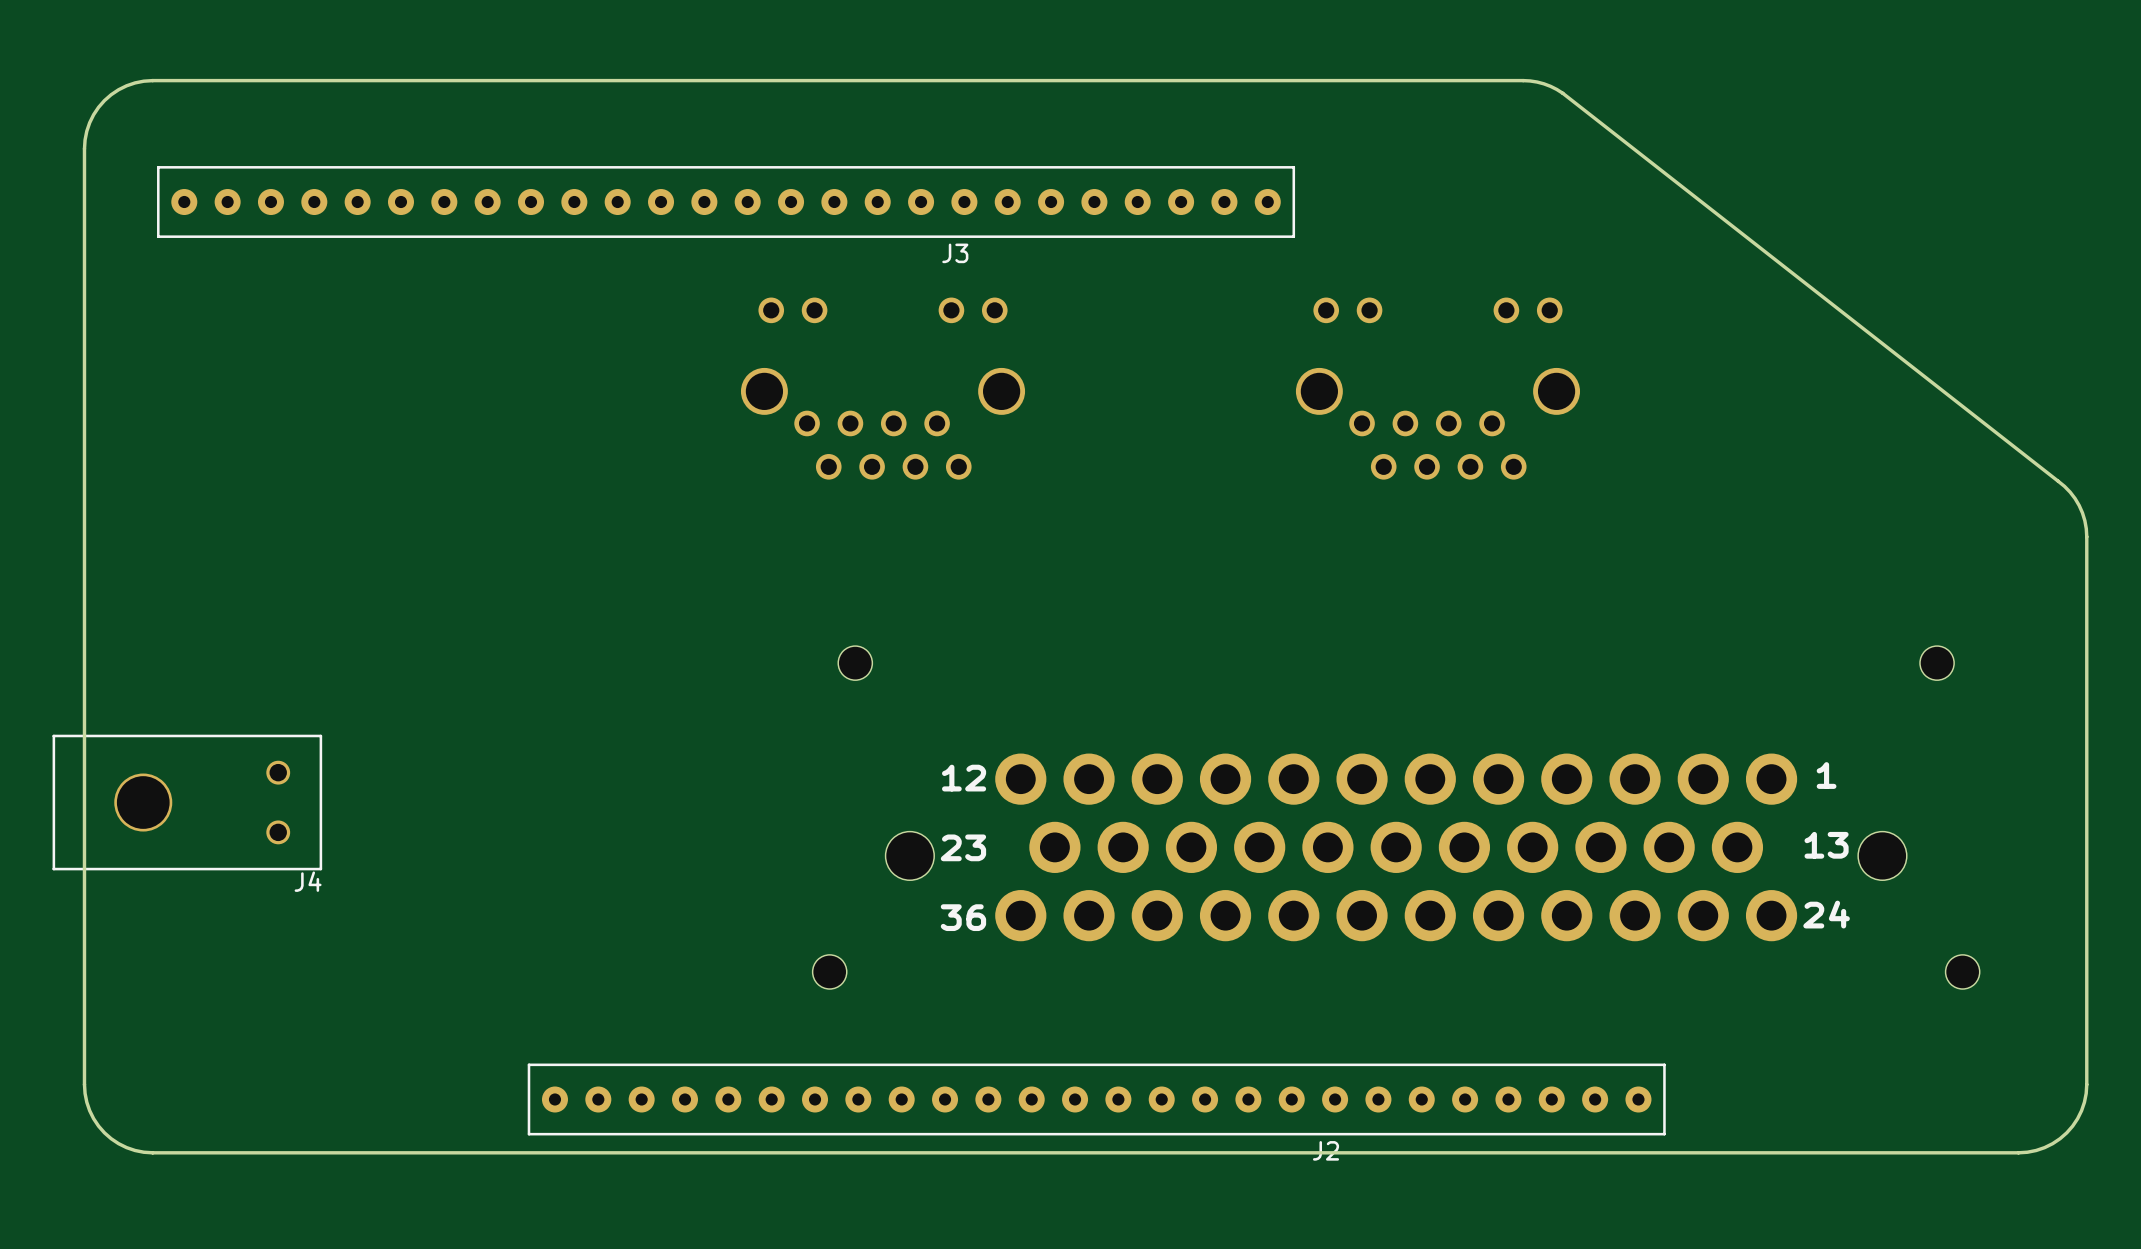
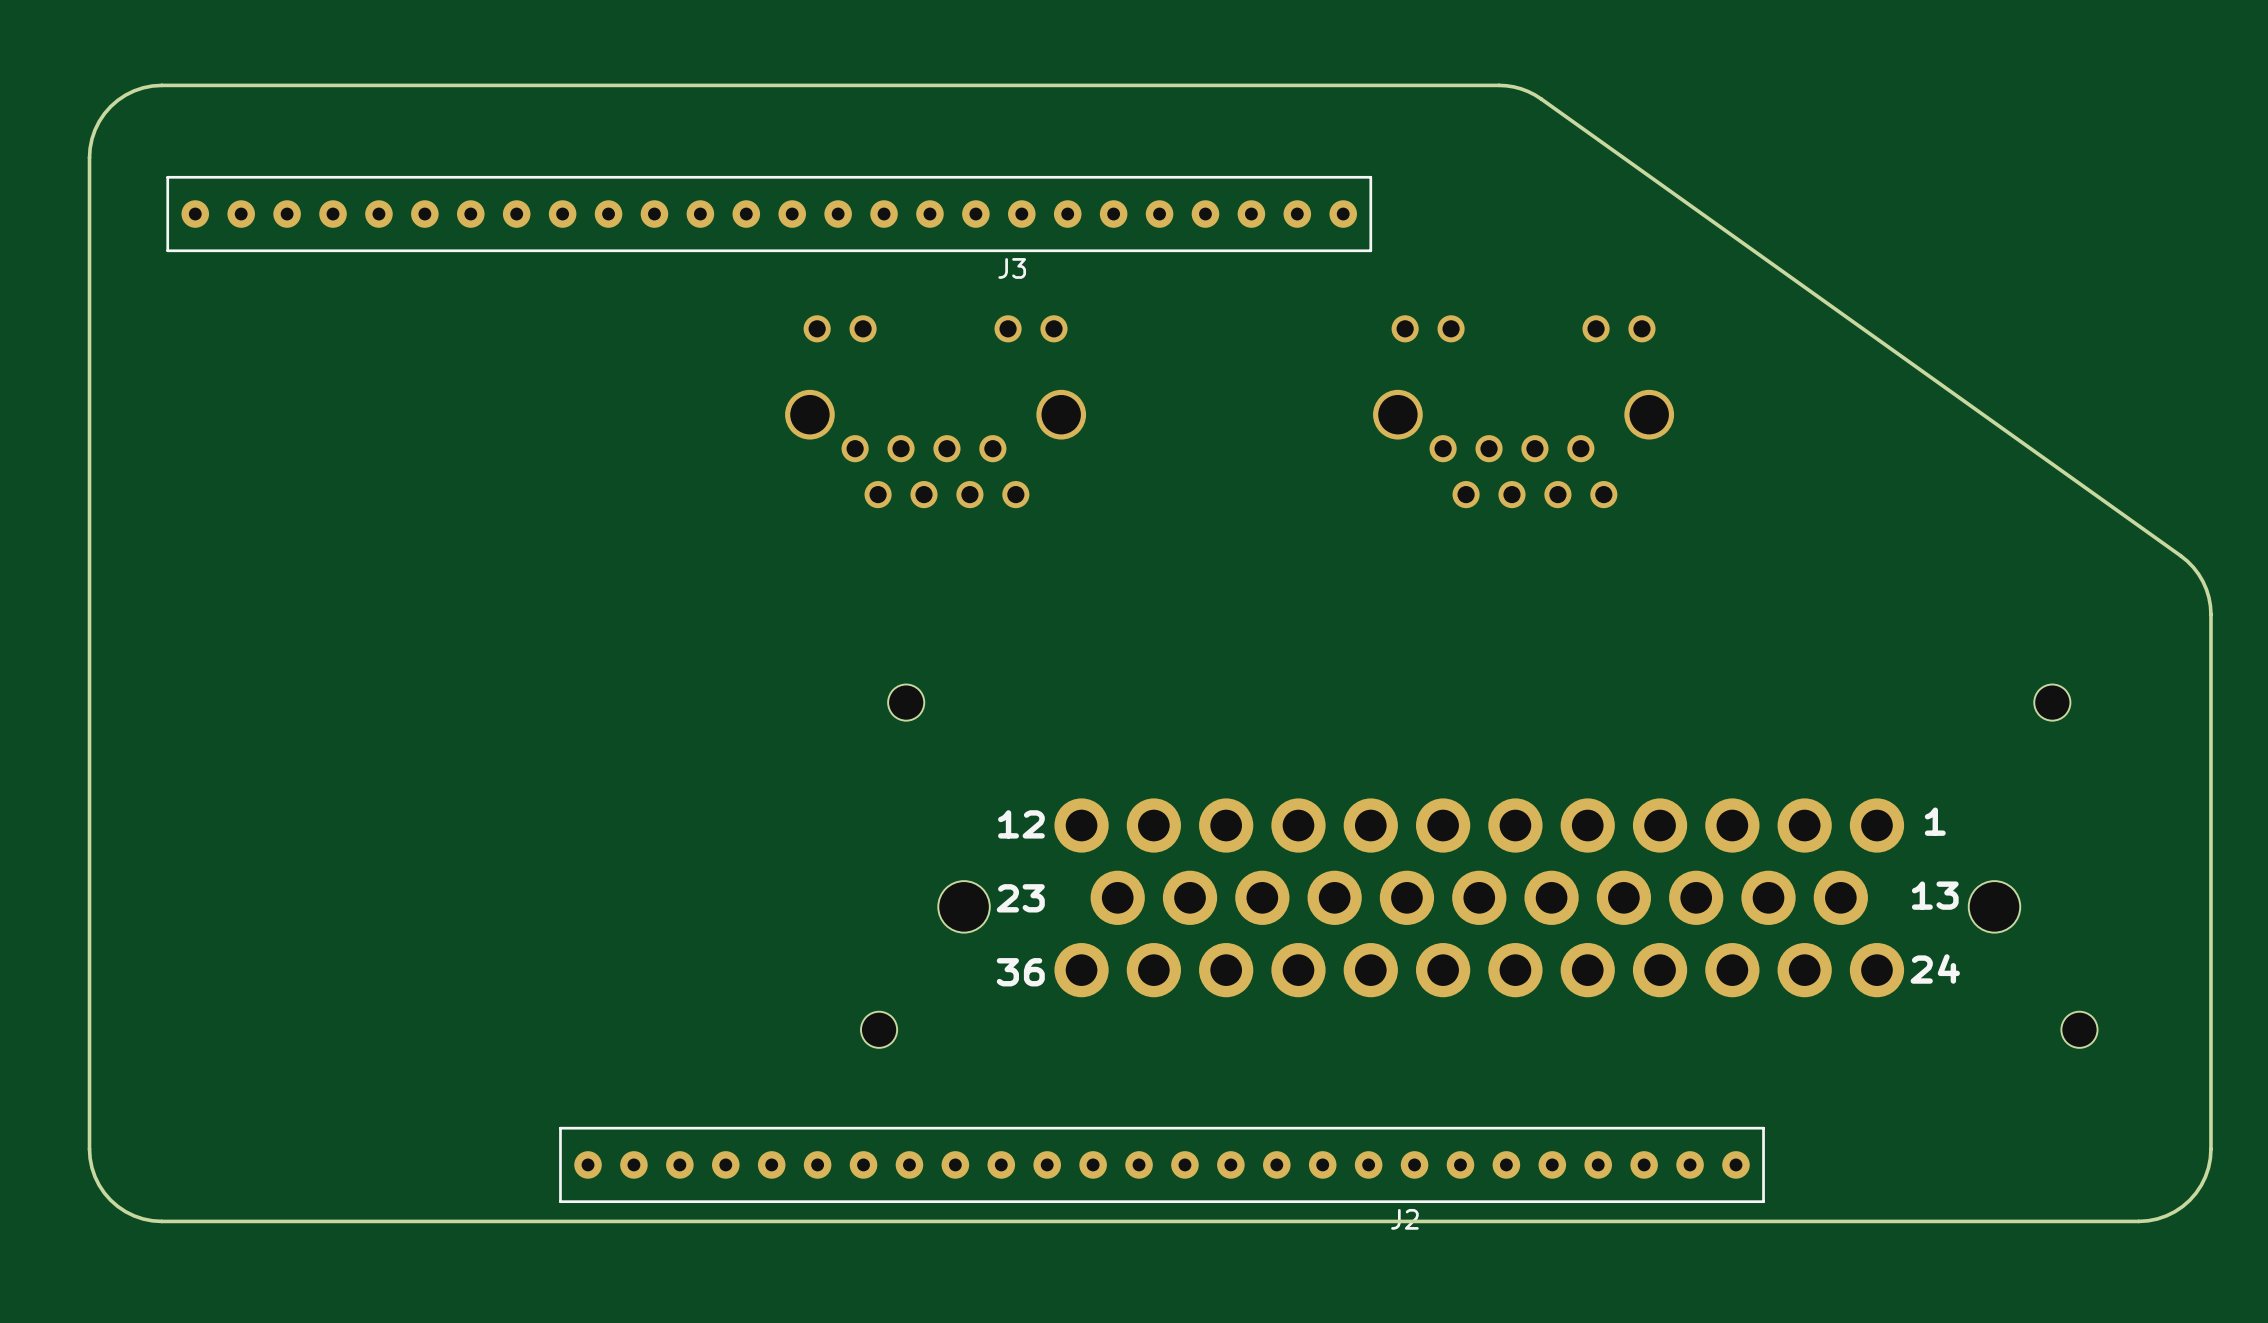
board edge: (152, 80) (1537, 82) (1562, 93) (2064, 486) (2075, 498) (2084, 520) (2086, 580) -> (161, 85) (1499, 85) (1513, 86) (1528, 91) (1541, 98) (2180, 555) (2193, 567) (2202, 581) (2208, 597) (2210, 614)
J4: (187, 802) -> none

